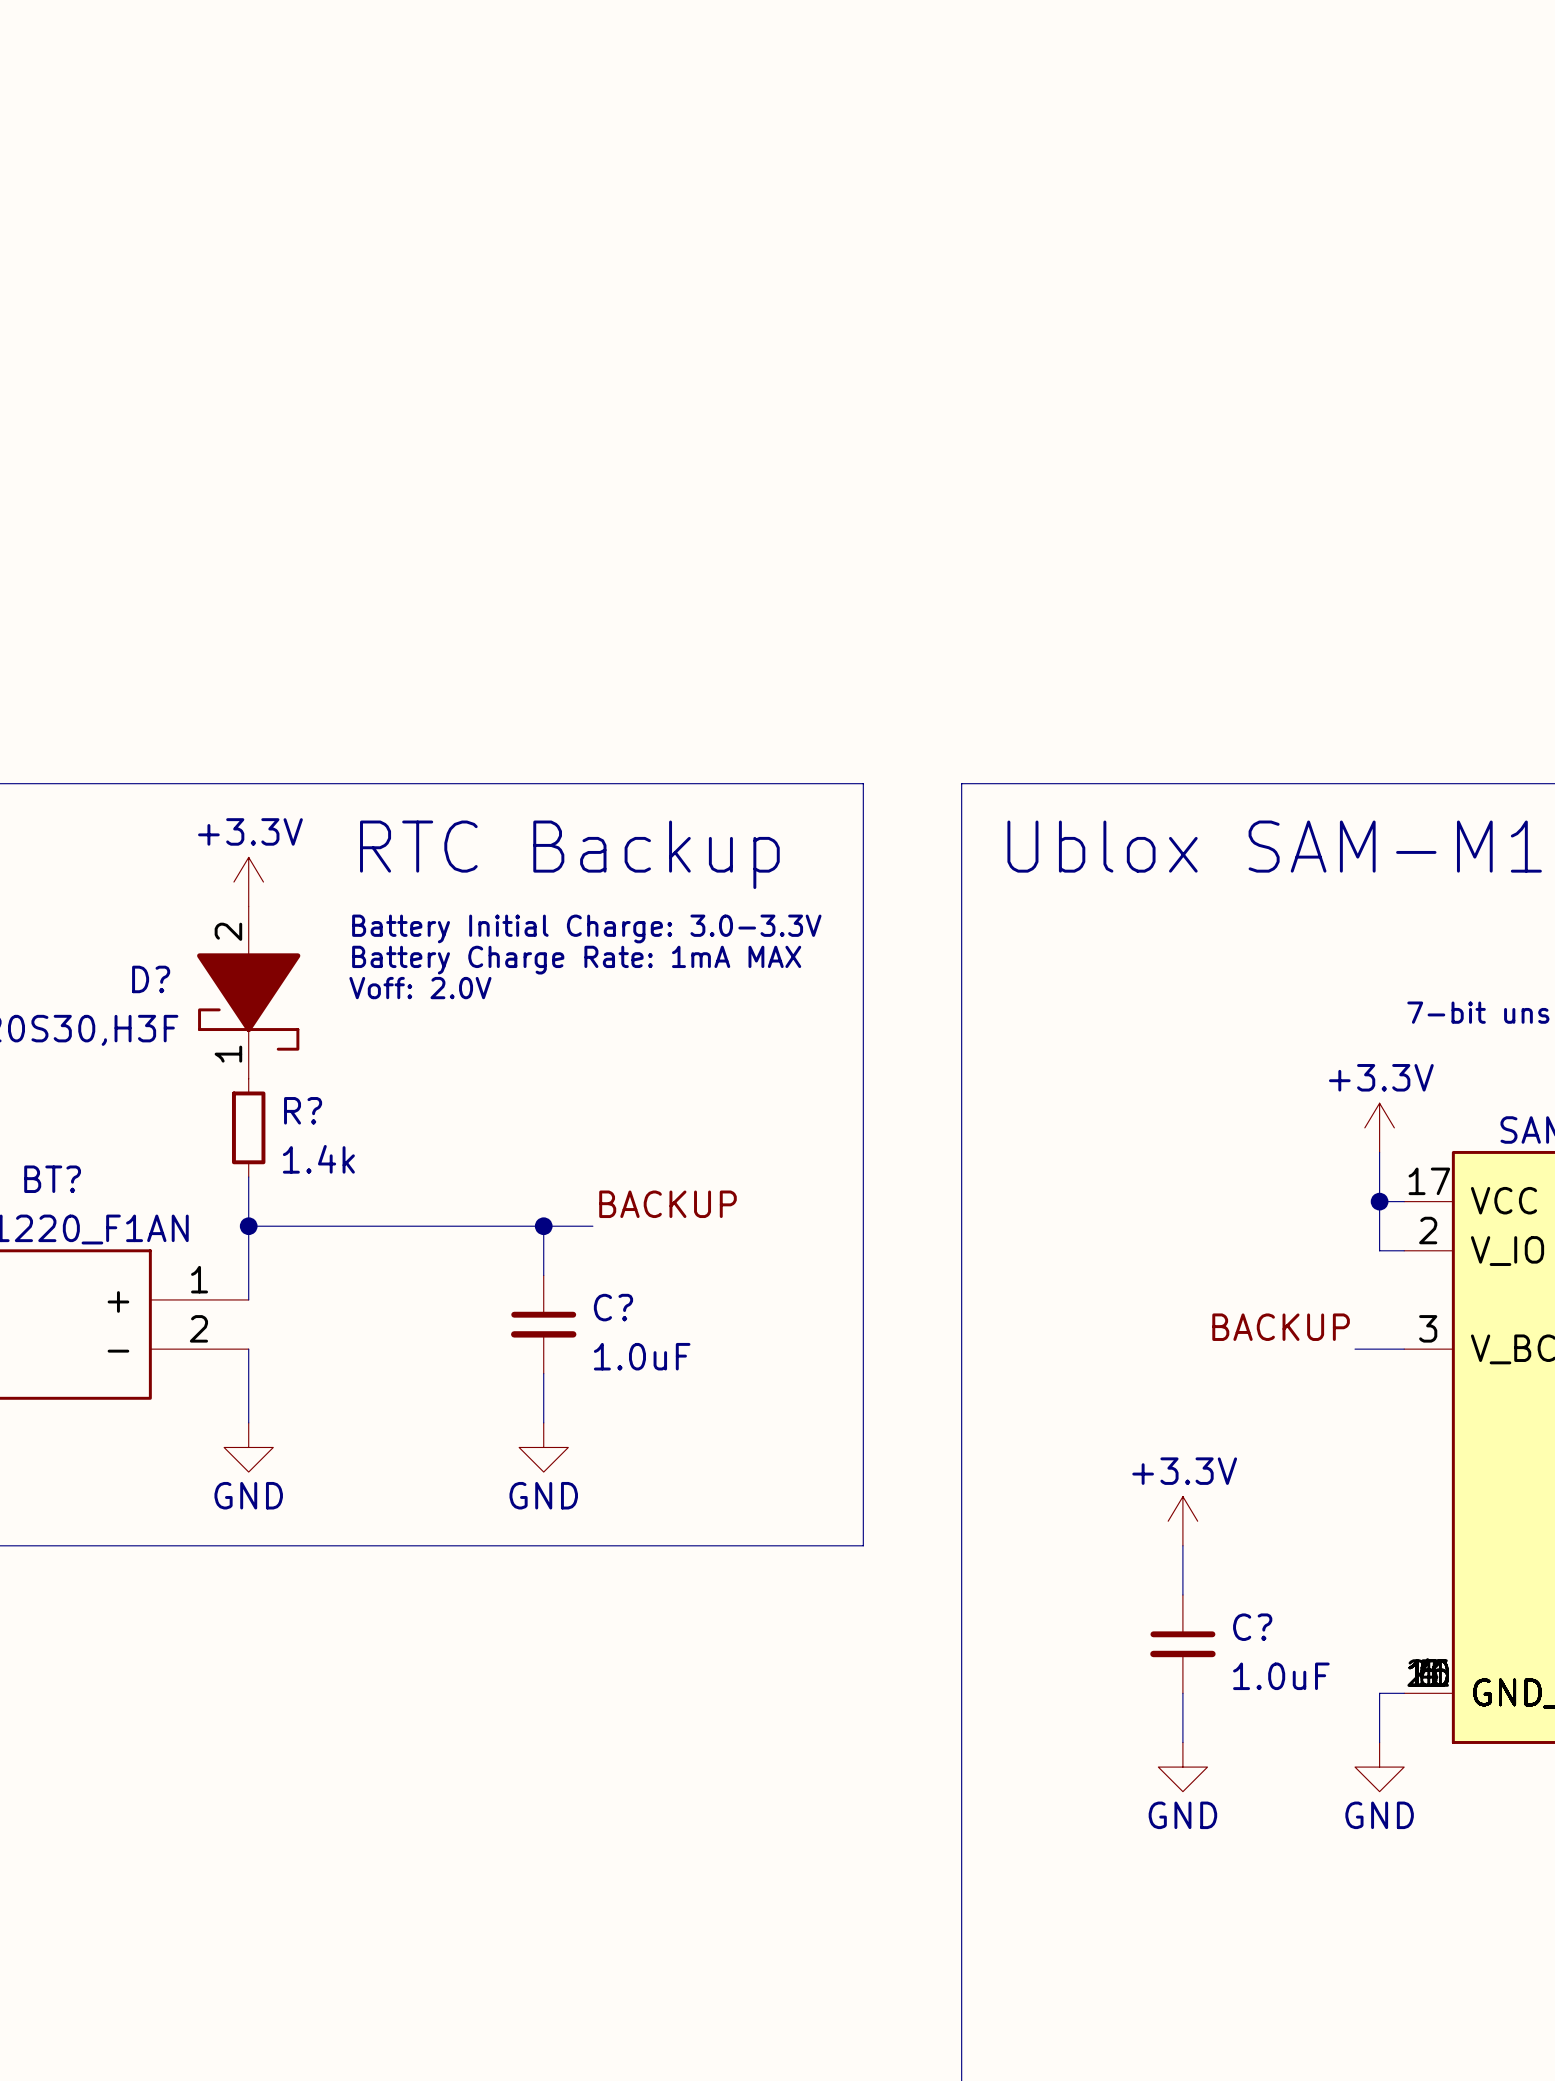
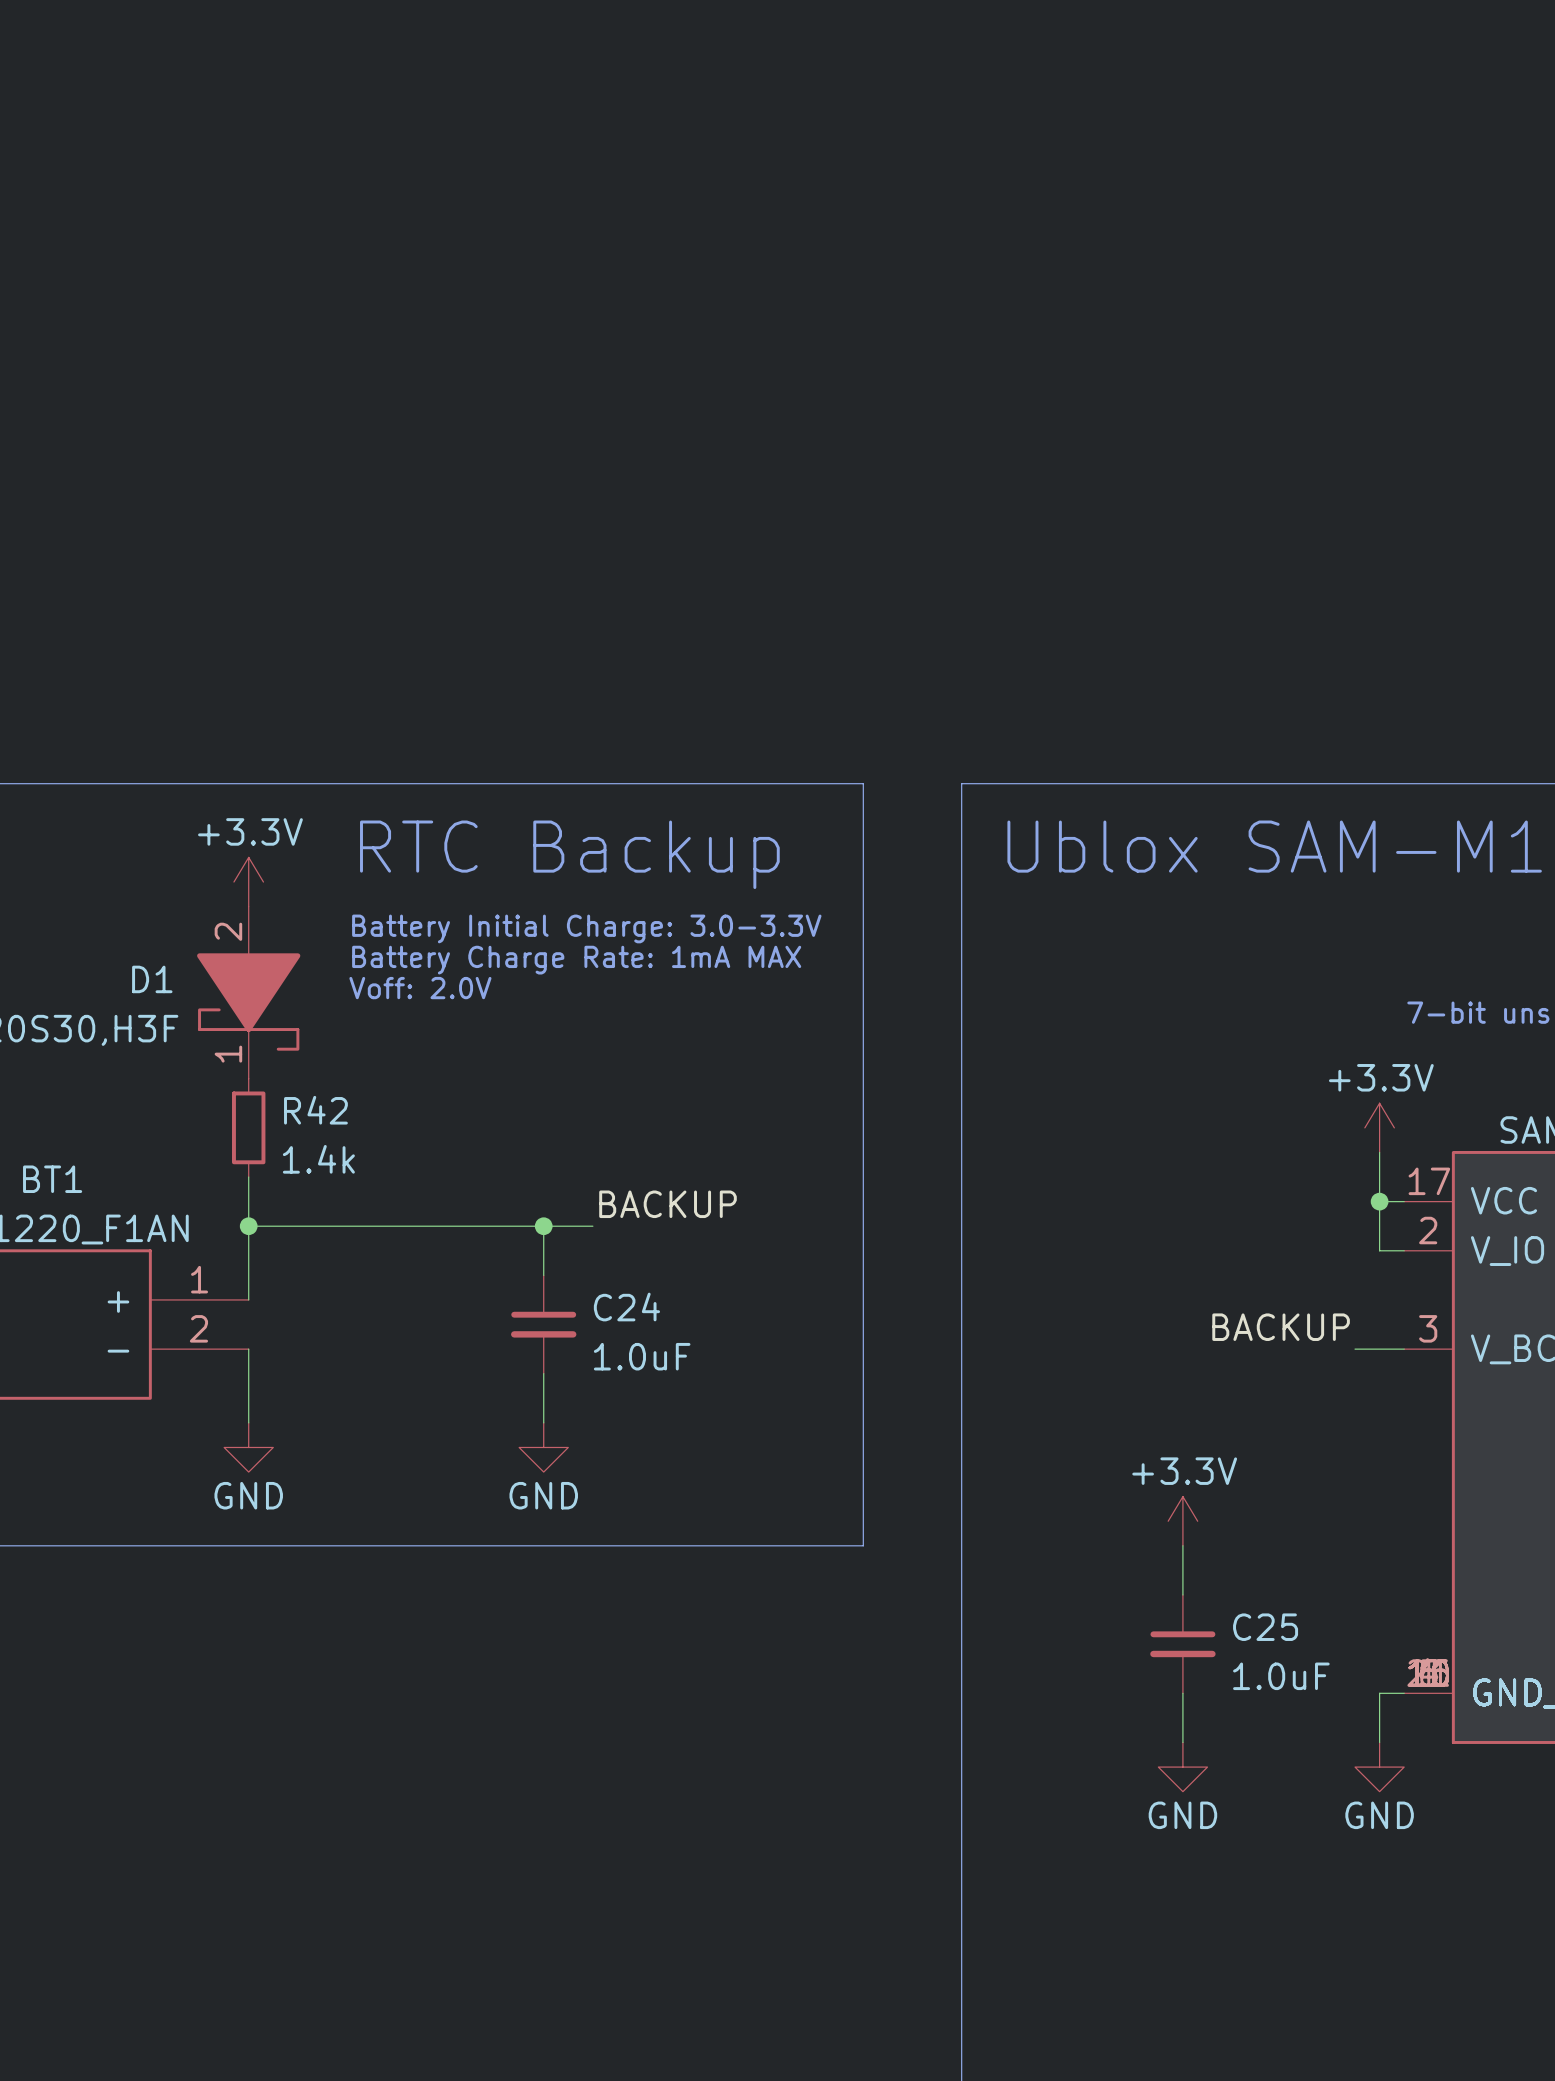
D? name: D? (151, 979) -> D1 (152, 979)
R? name: R? (303, 1110) -> R42 (315, 1110)
BT? name: BT? (52, 1179) -> BT1 (52, 1179)
C? name: C? (613, 1307) -> C24 (626, 1307)
C? name: C? (1252, 1627) -> C25 (1265, 1627)

